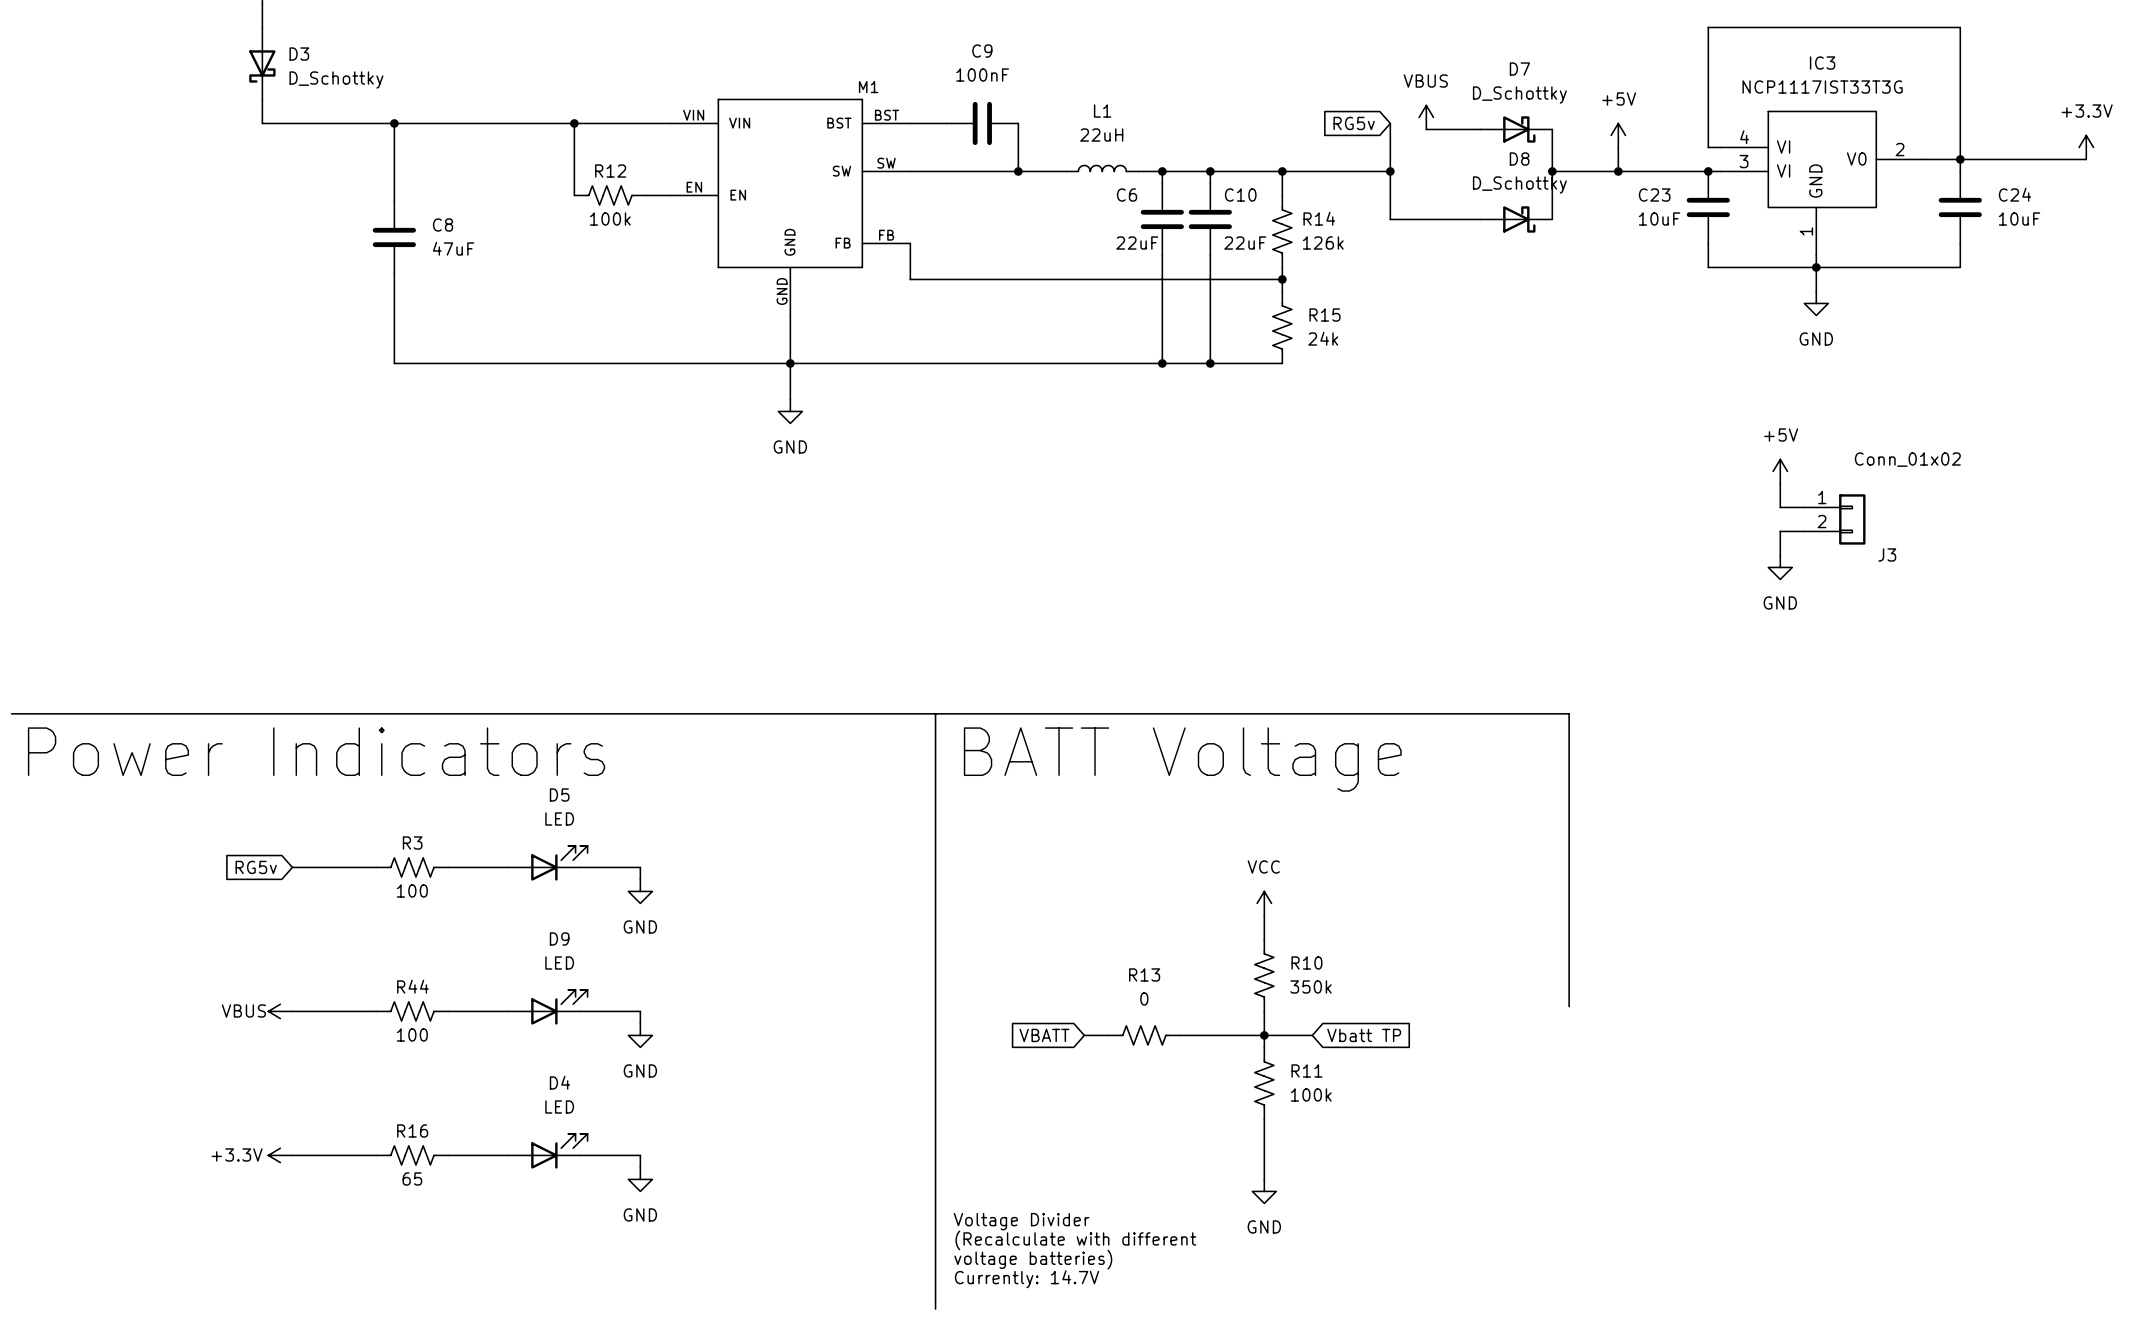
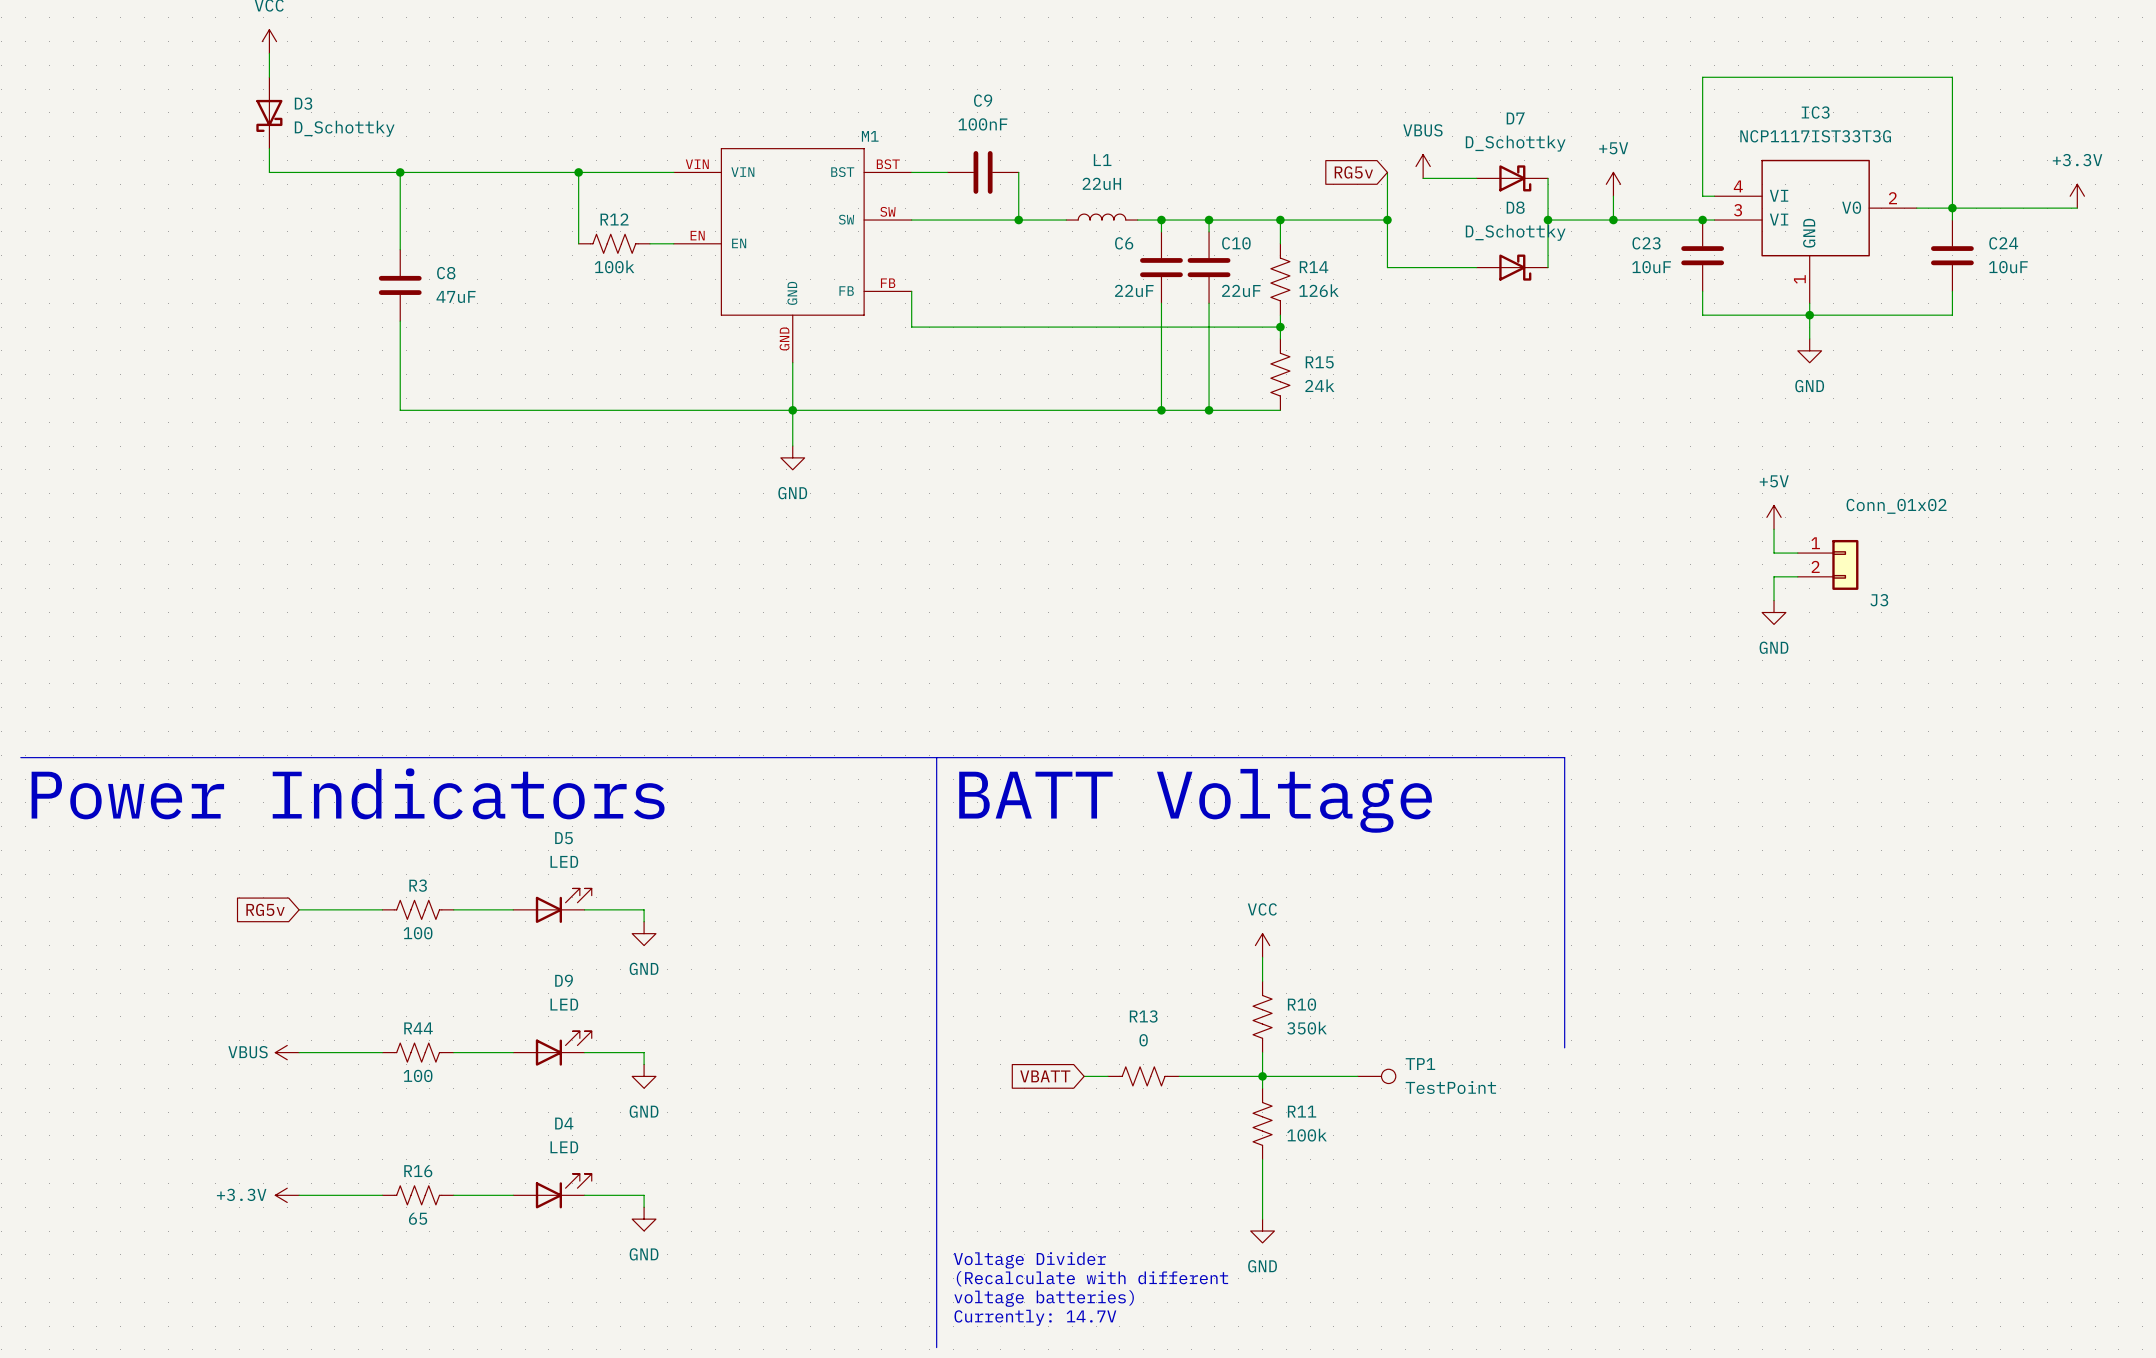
wire: none -> (1310, 1076) (1357, 1076)
global label: Vbatt TP (1364, 1035) -> none
TP1: none -> TestPoint (1376, 1076)

